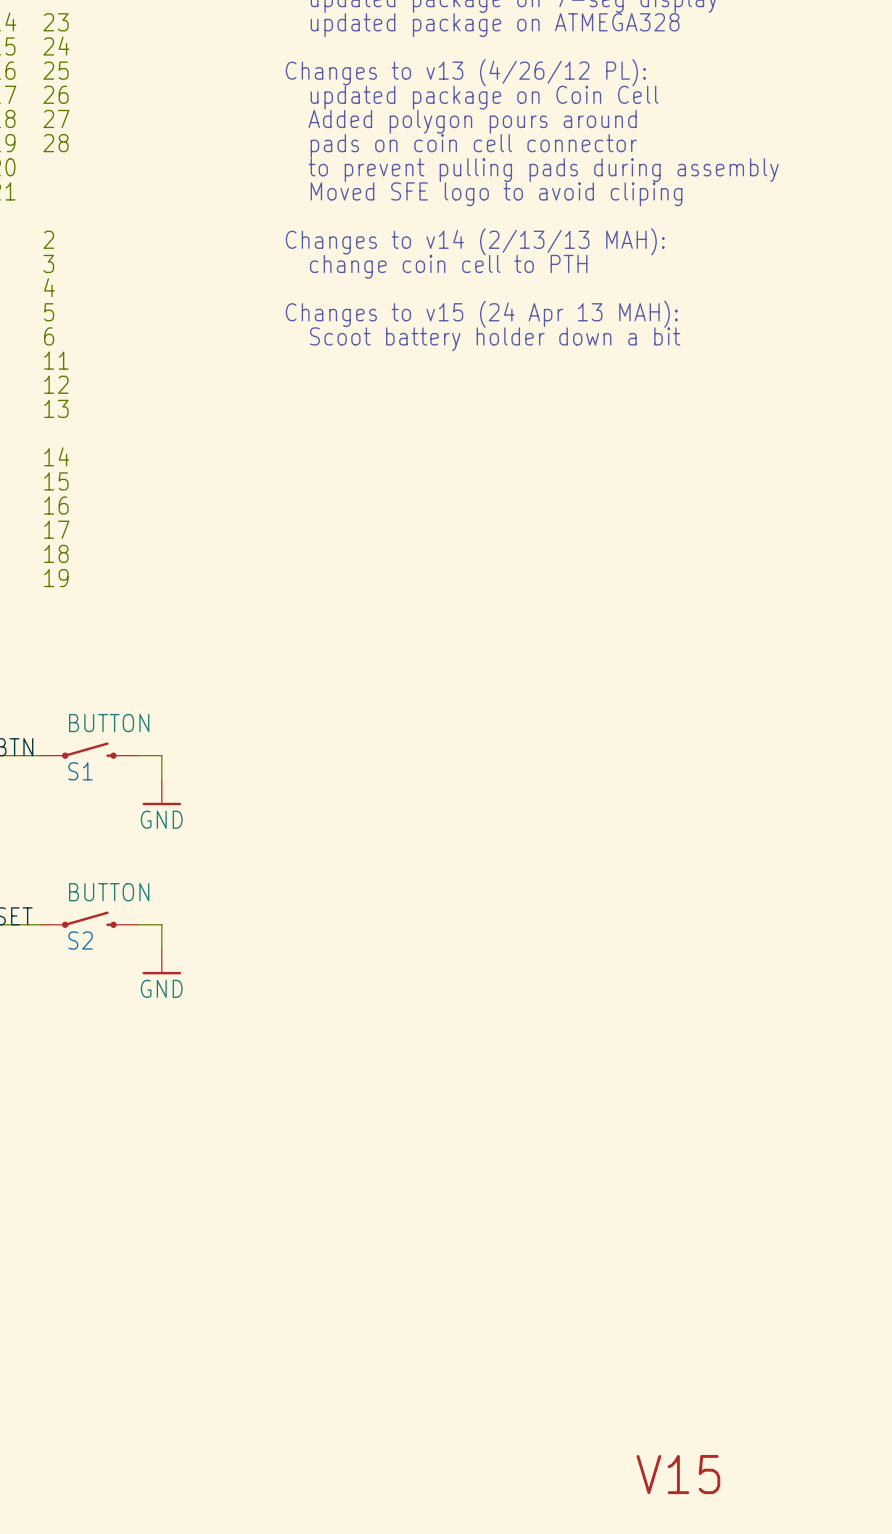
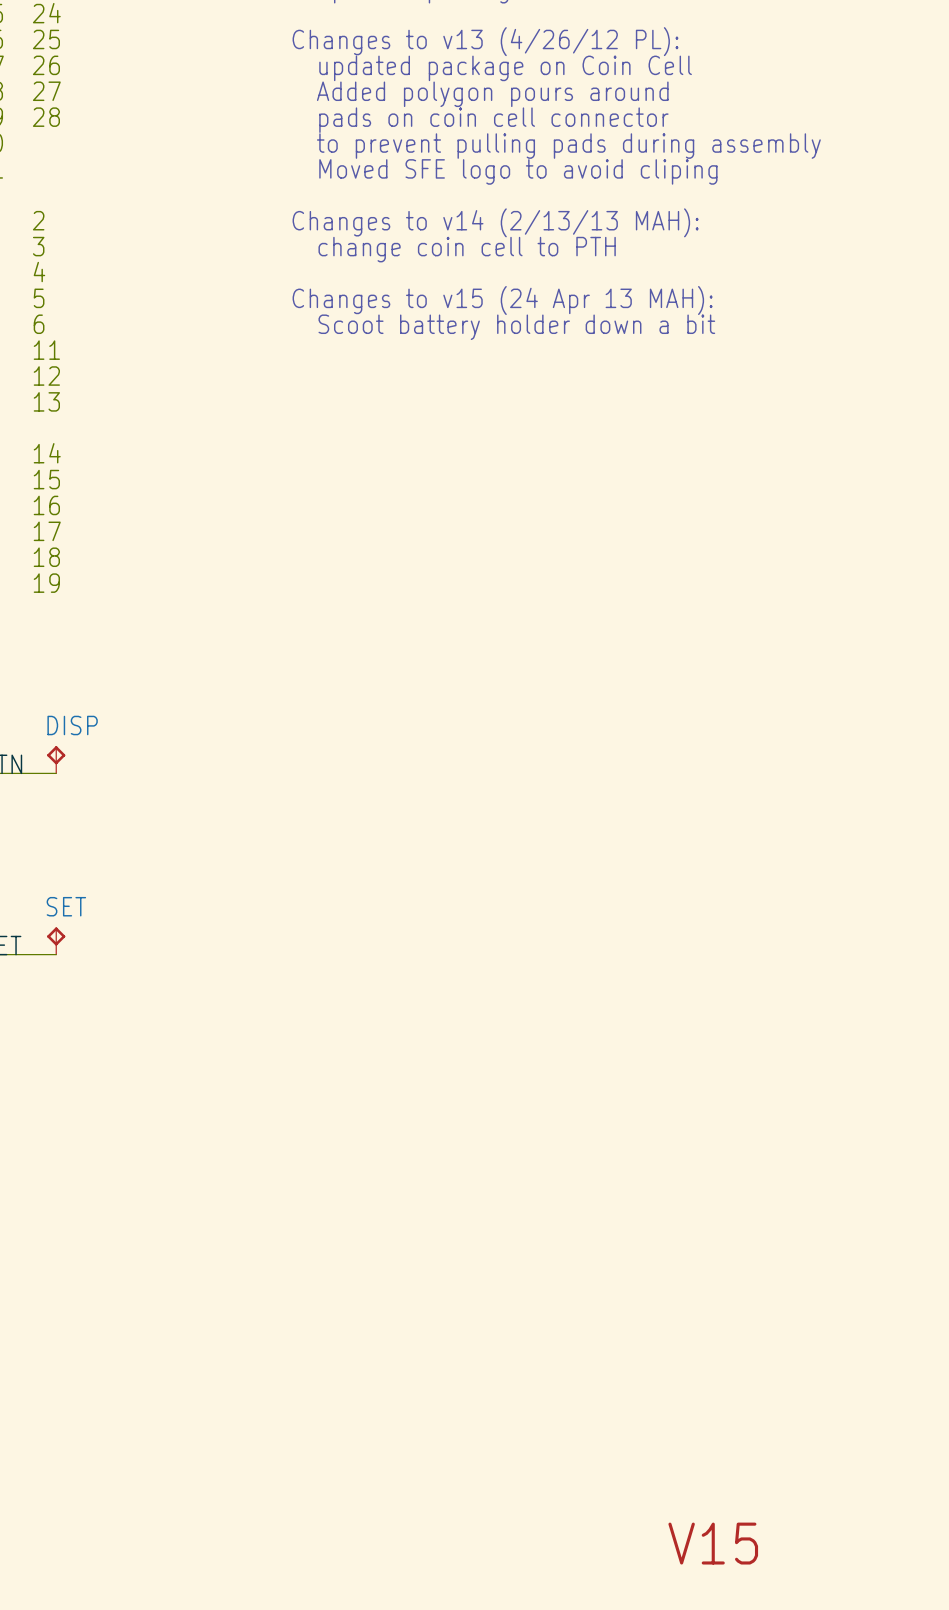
DISP: none -> (56, 759)
S1: BUTTON (89, 750) -> none
wire: (137, 755) (161, 755) (161, 779) -> none
power symbol: GND (161, 792) -> none
SET: none -> (56, 941)
S2: BUTTON (89, 919) -> none
wire: (137, 924) (161, 924) (161, 948) -> none
power symbol: GND (161, 961) -> none

